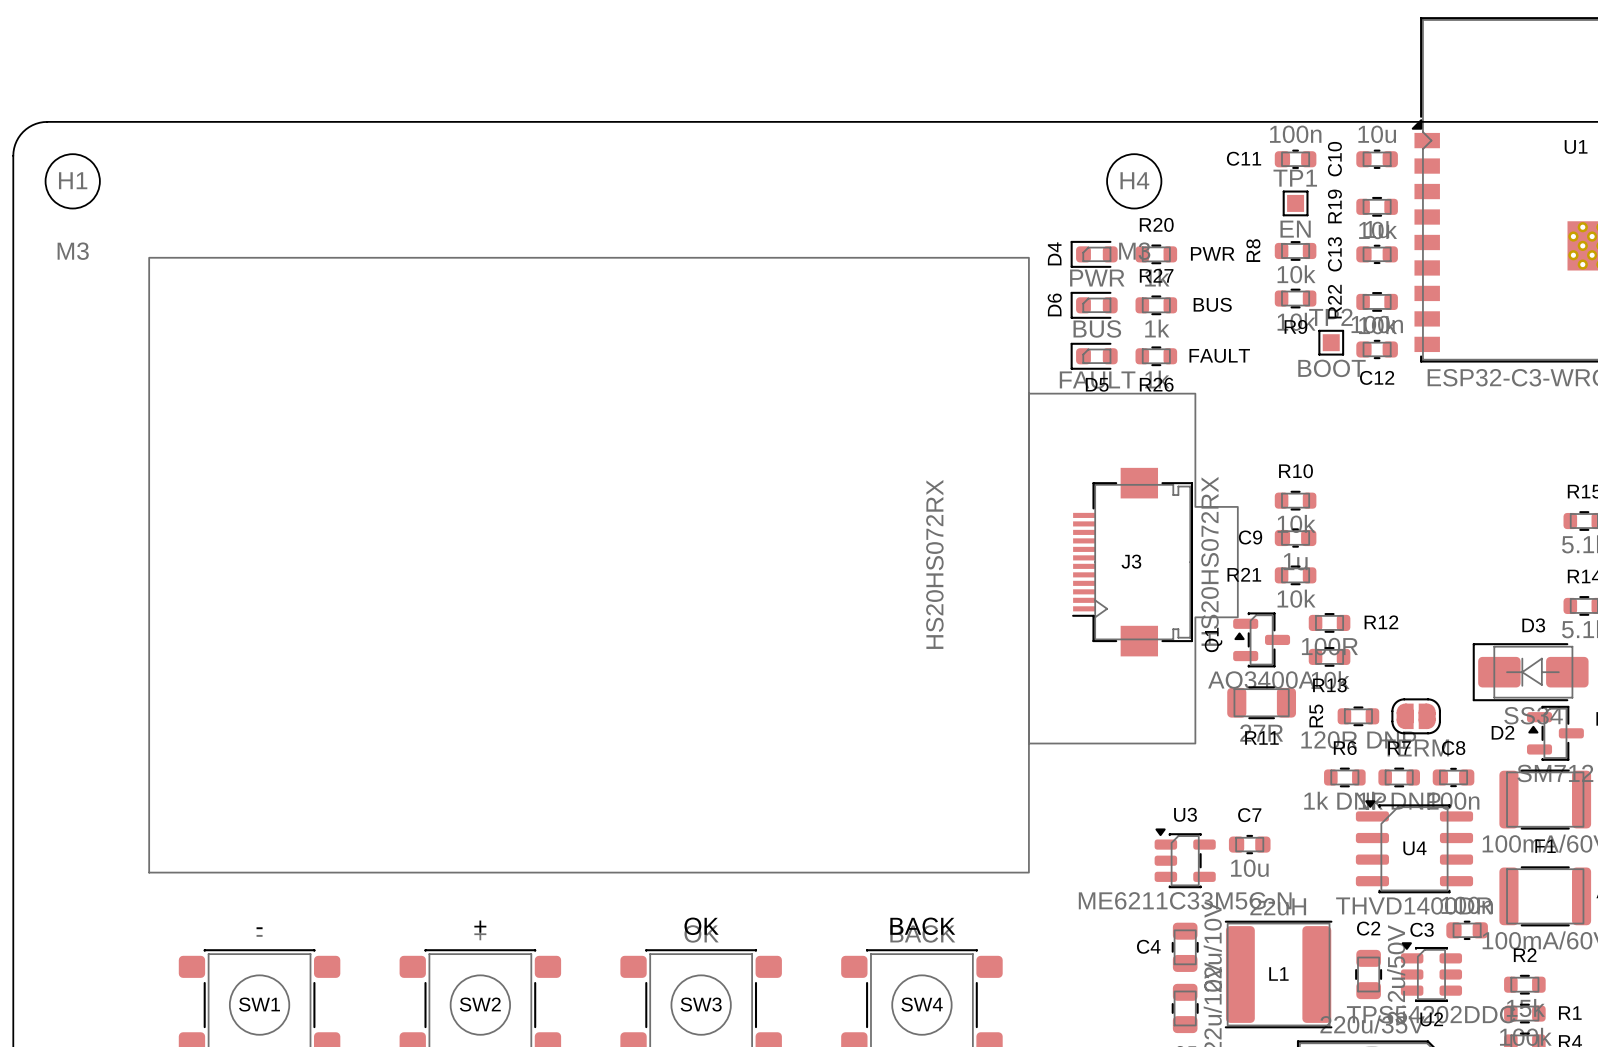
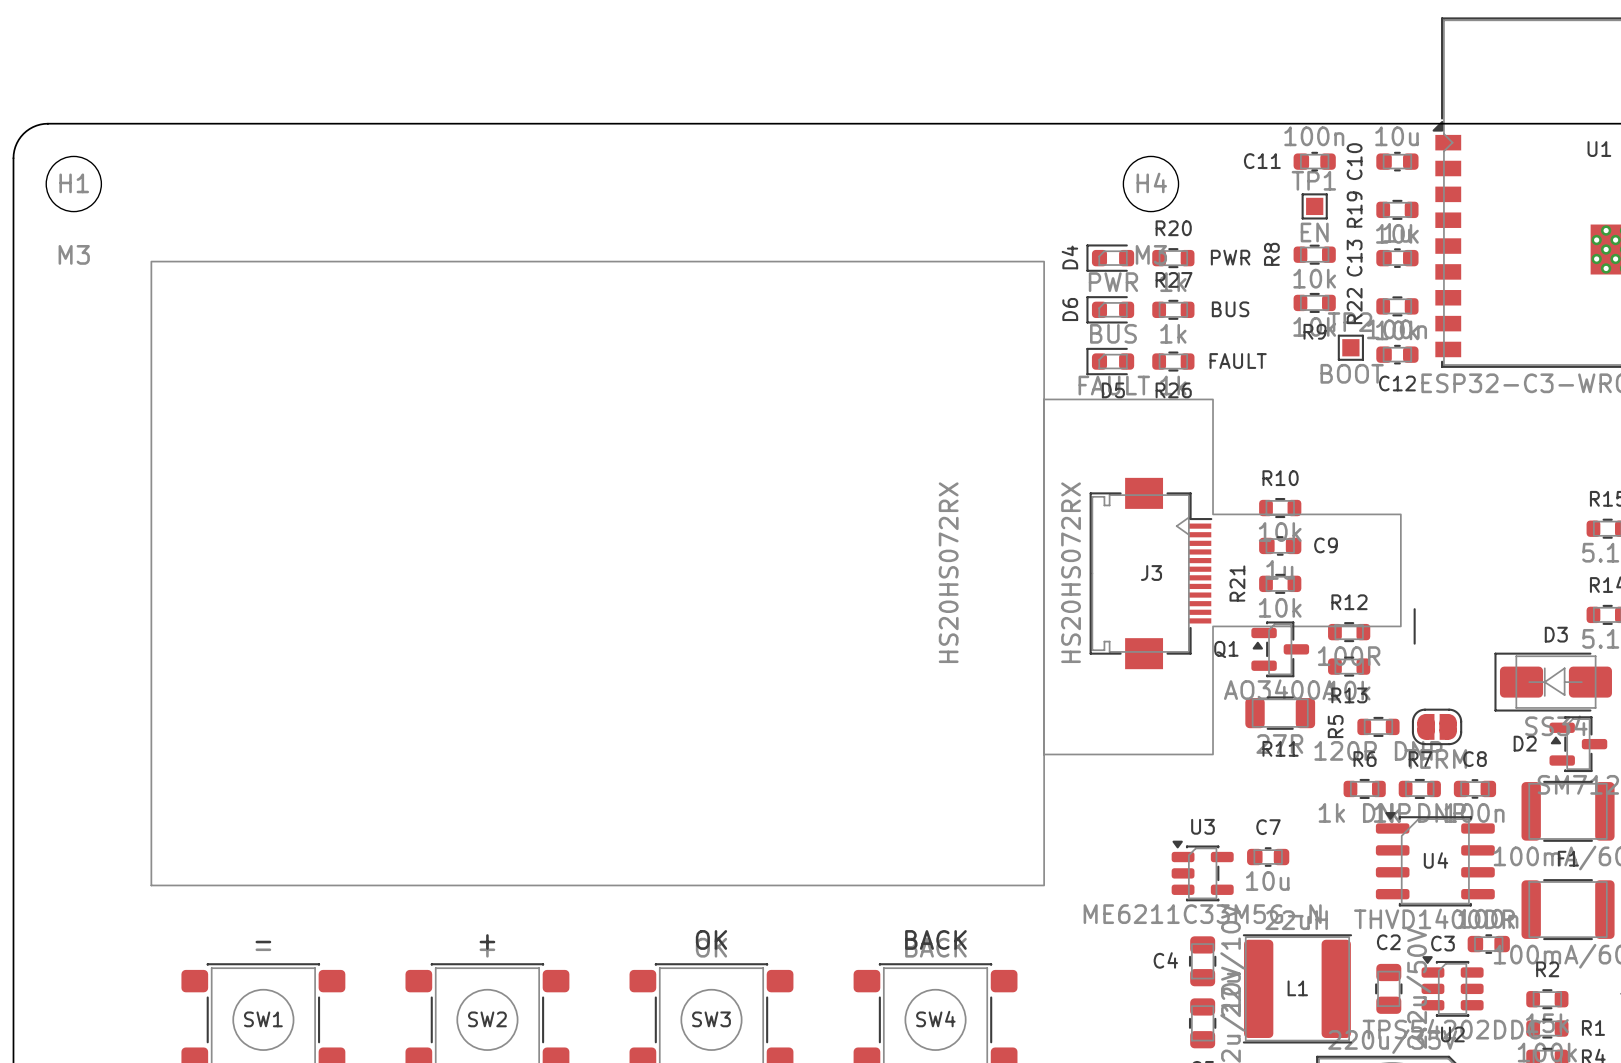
drawing: [148, 256, 1239, 874] -> none
drawing: none -> [150, 260, 1416, 887]
R10 position: (1295, 500) -> (1280, 508)
C9 name position: C9 (1250, 537) -> C9 (1325, 545)
C9 position: (1295, 538) -> (1280, 545)
J3 rotation: 0° (1132, 562) -> 180° (1150, 573)
R21 name rotation: 0° (1244, 574) -> 90° counterclockwise (1237, 583)
R21 position: (1295, 575) -> (1280, 583)
R12 name position: R12 (1381, 622) -> R12 (1349, 602)
Q1 name rotation: 0° (1213, 639) -> 90° clockwise (1226, 649)

